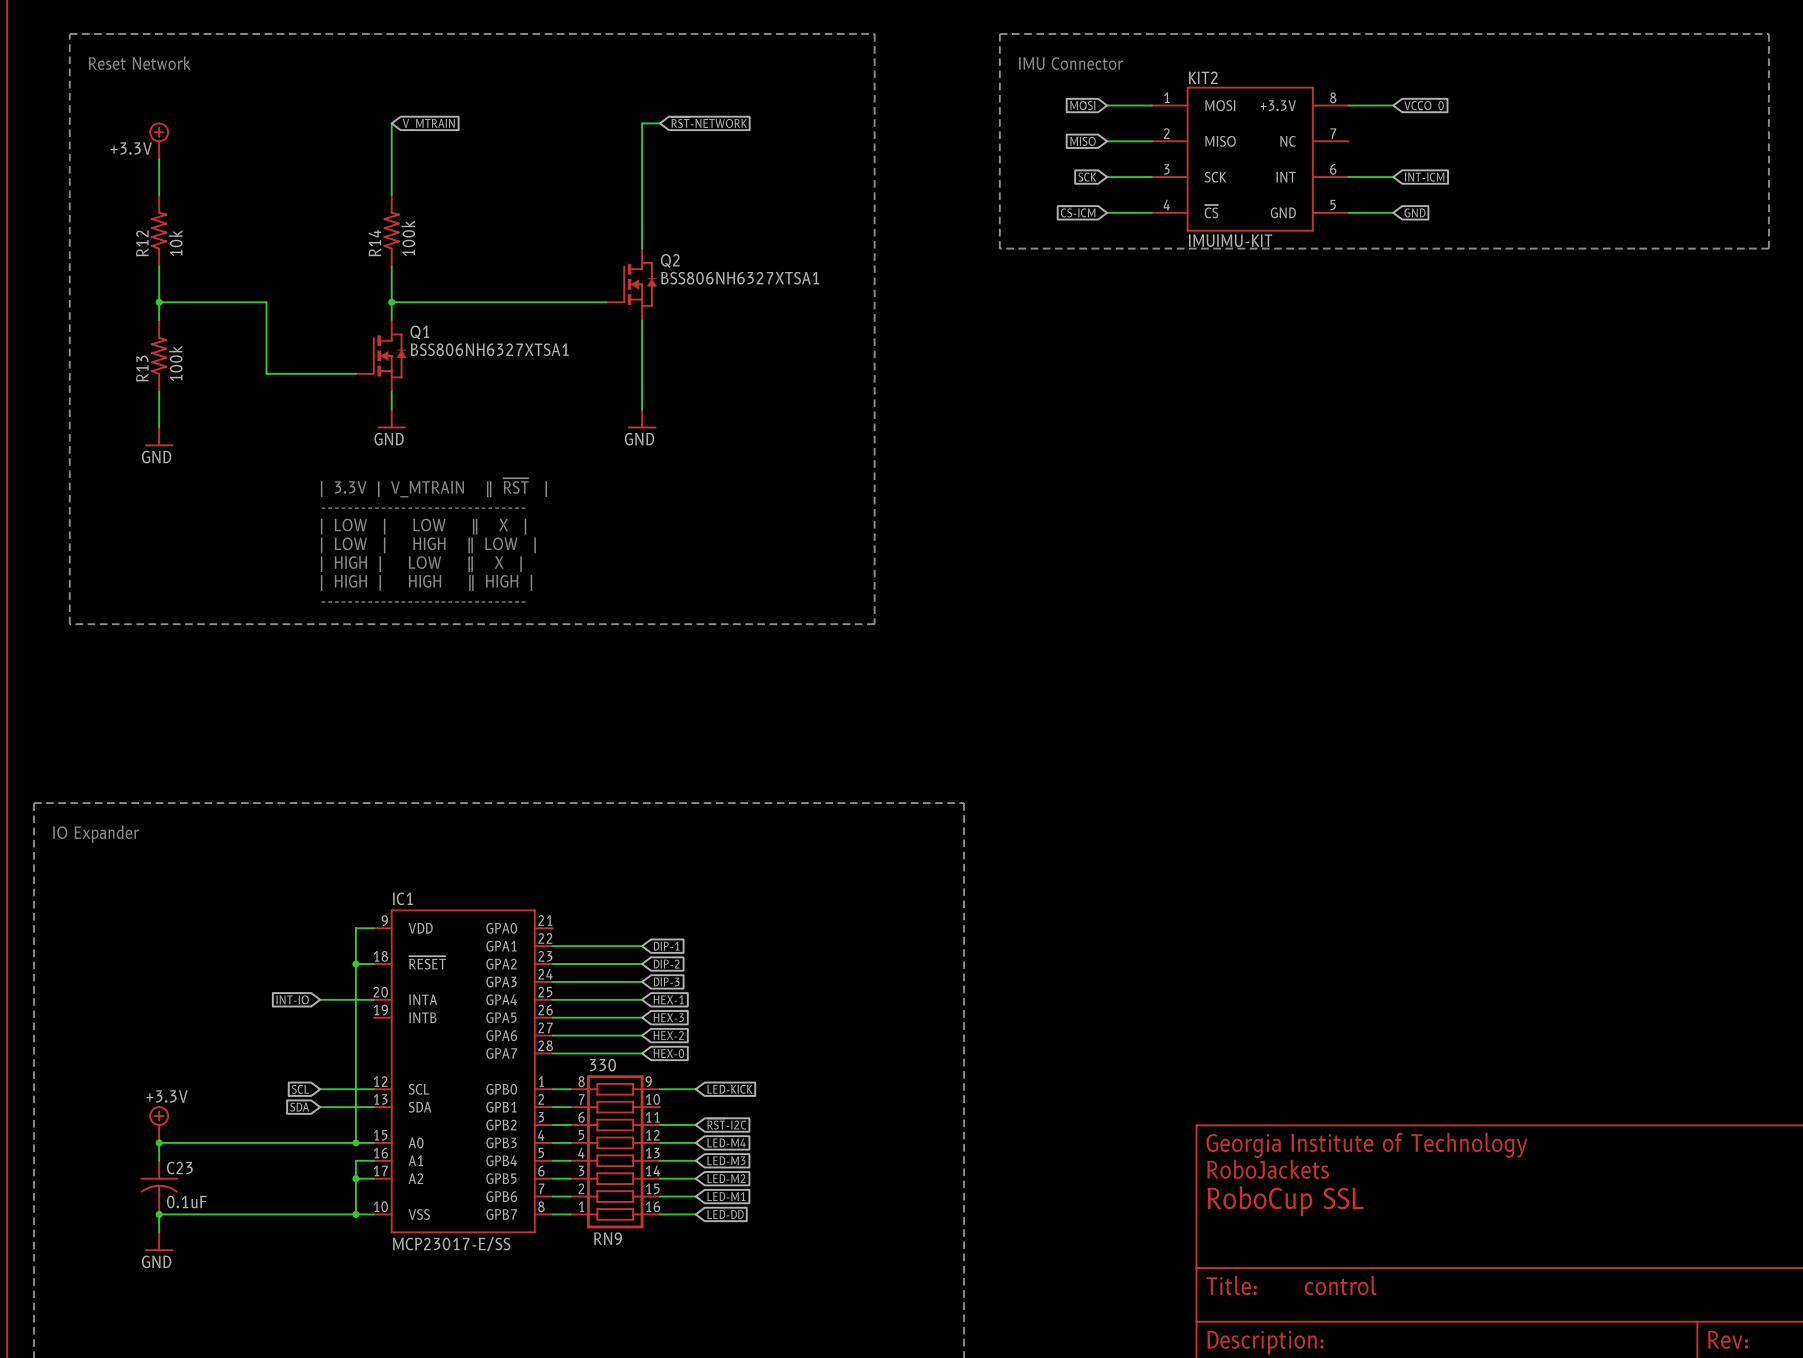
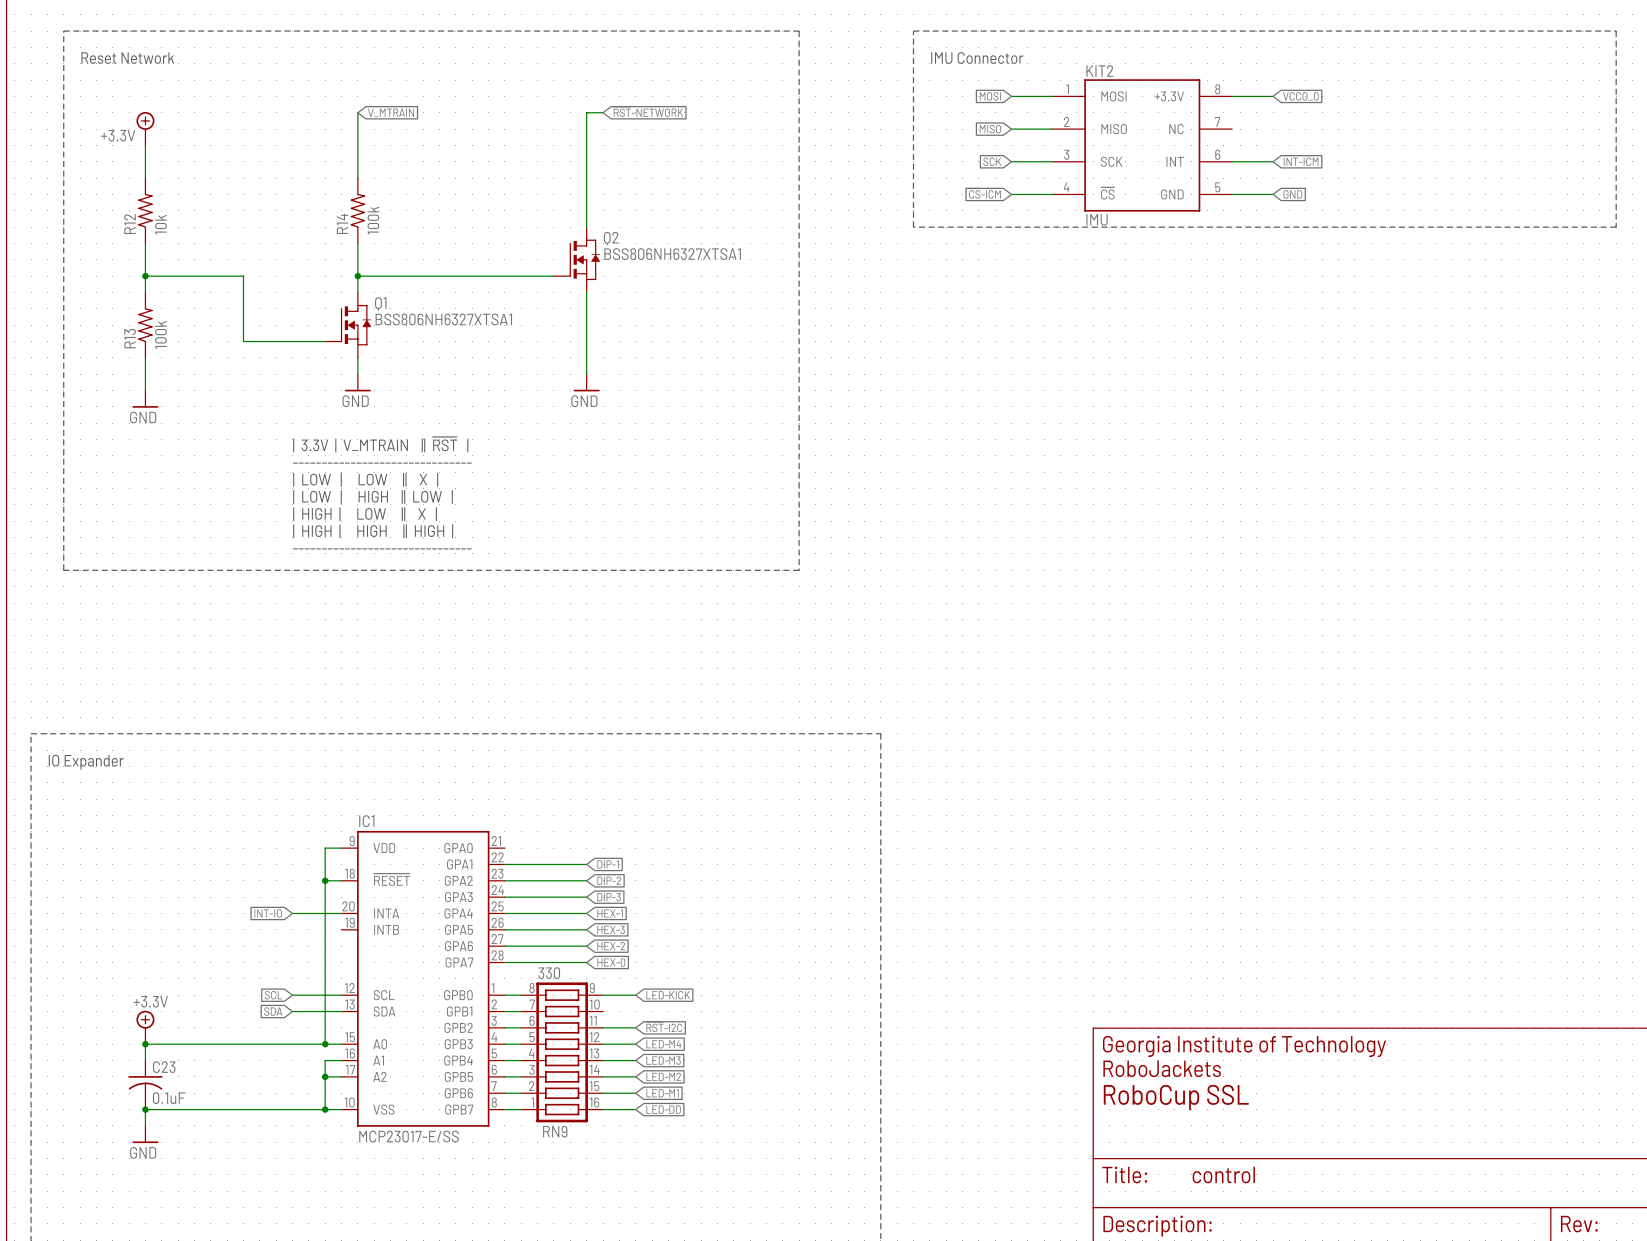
KIT2 value: IMUIMU-KIT (1230, 240) -> IMU (1097, 219)

